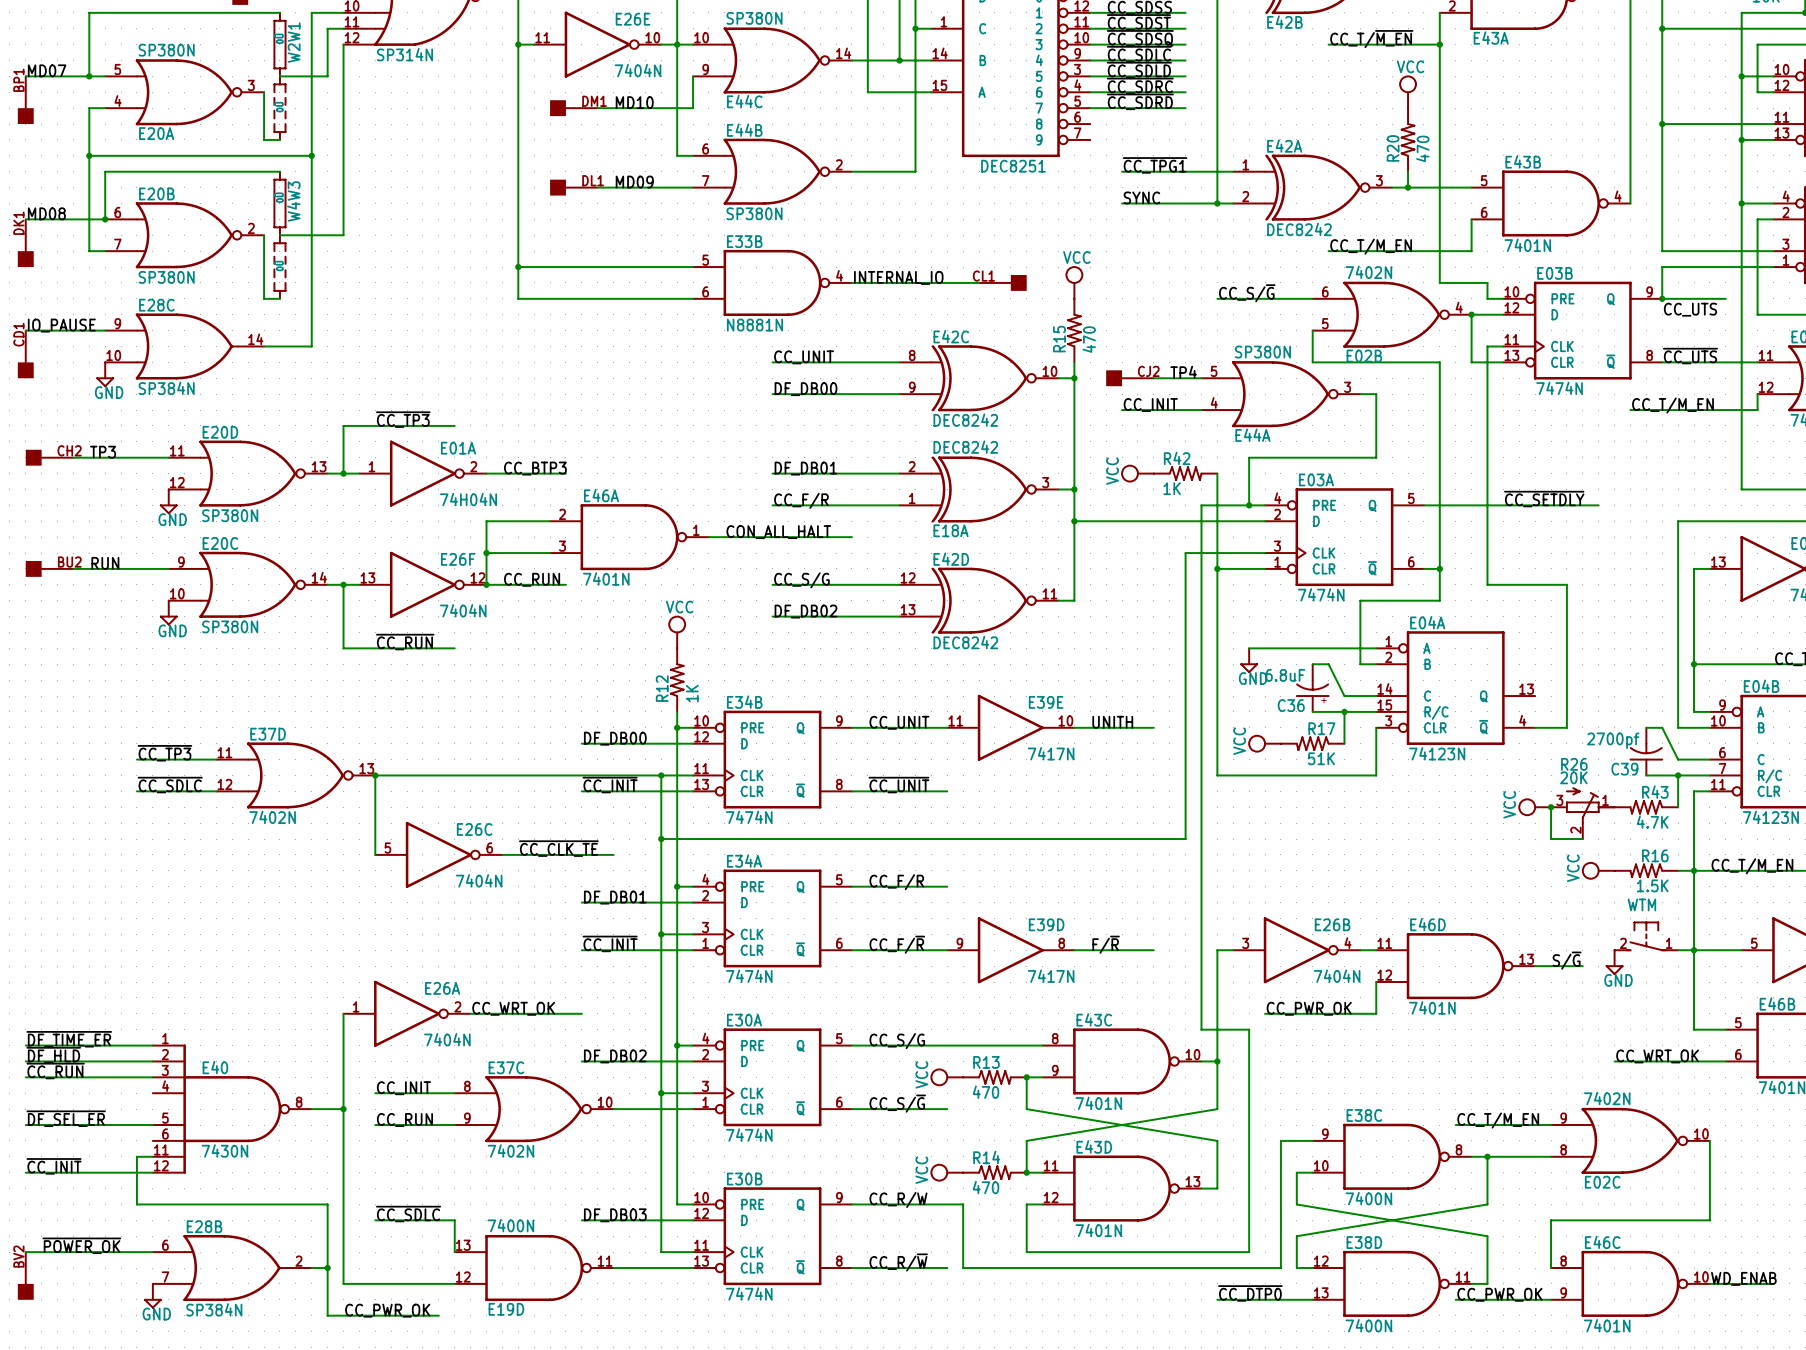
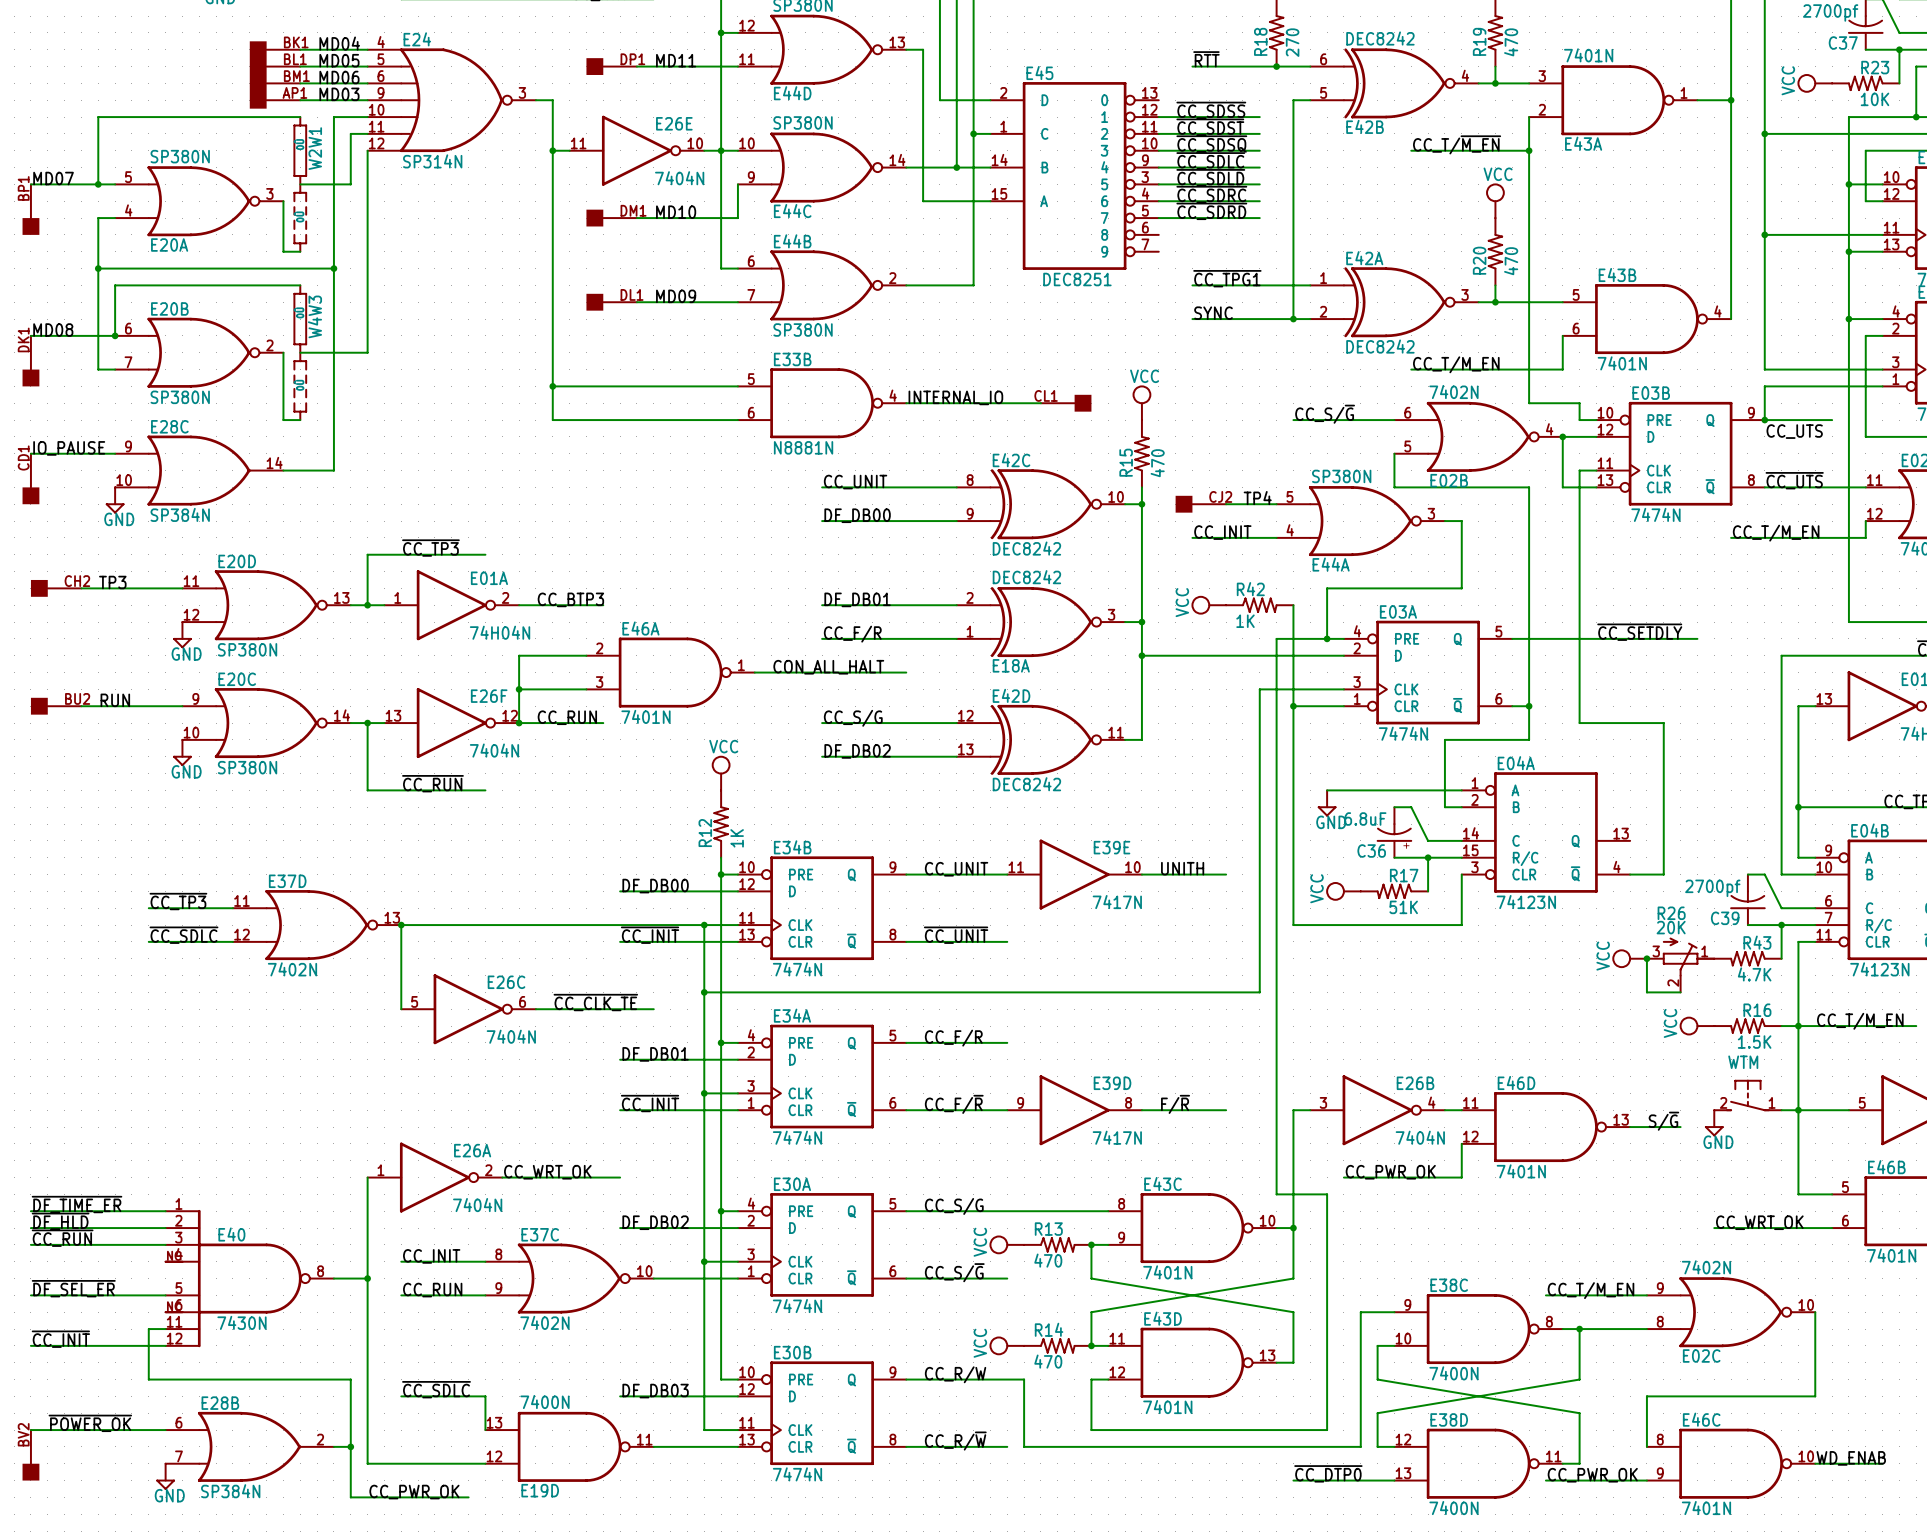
power symbol: none -> (174, 1261)
power symbol: none -> (174, 1312)

